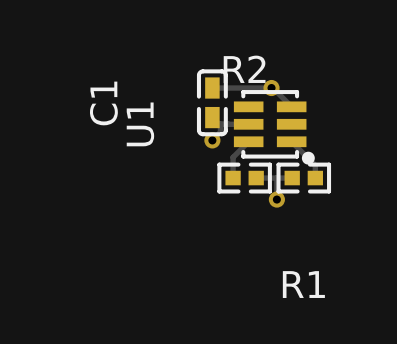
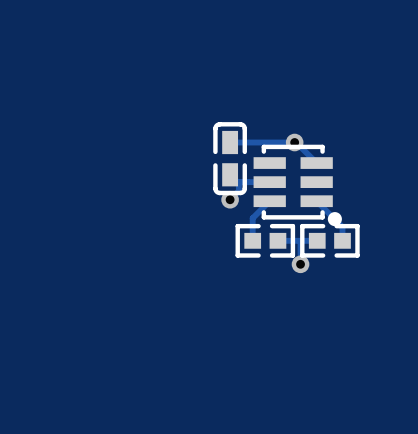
R2 name: R2 (244, 69) -> none
C1 name: C1 (103, 103) -> none
U1 name: U1 (140, 124) -> none
R1 name: R1 (303, 284) -> none

